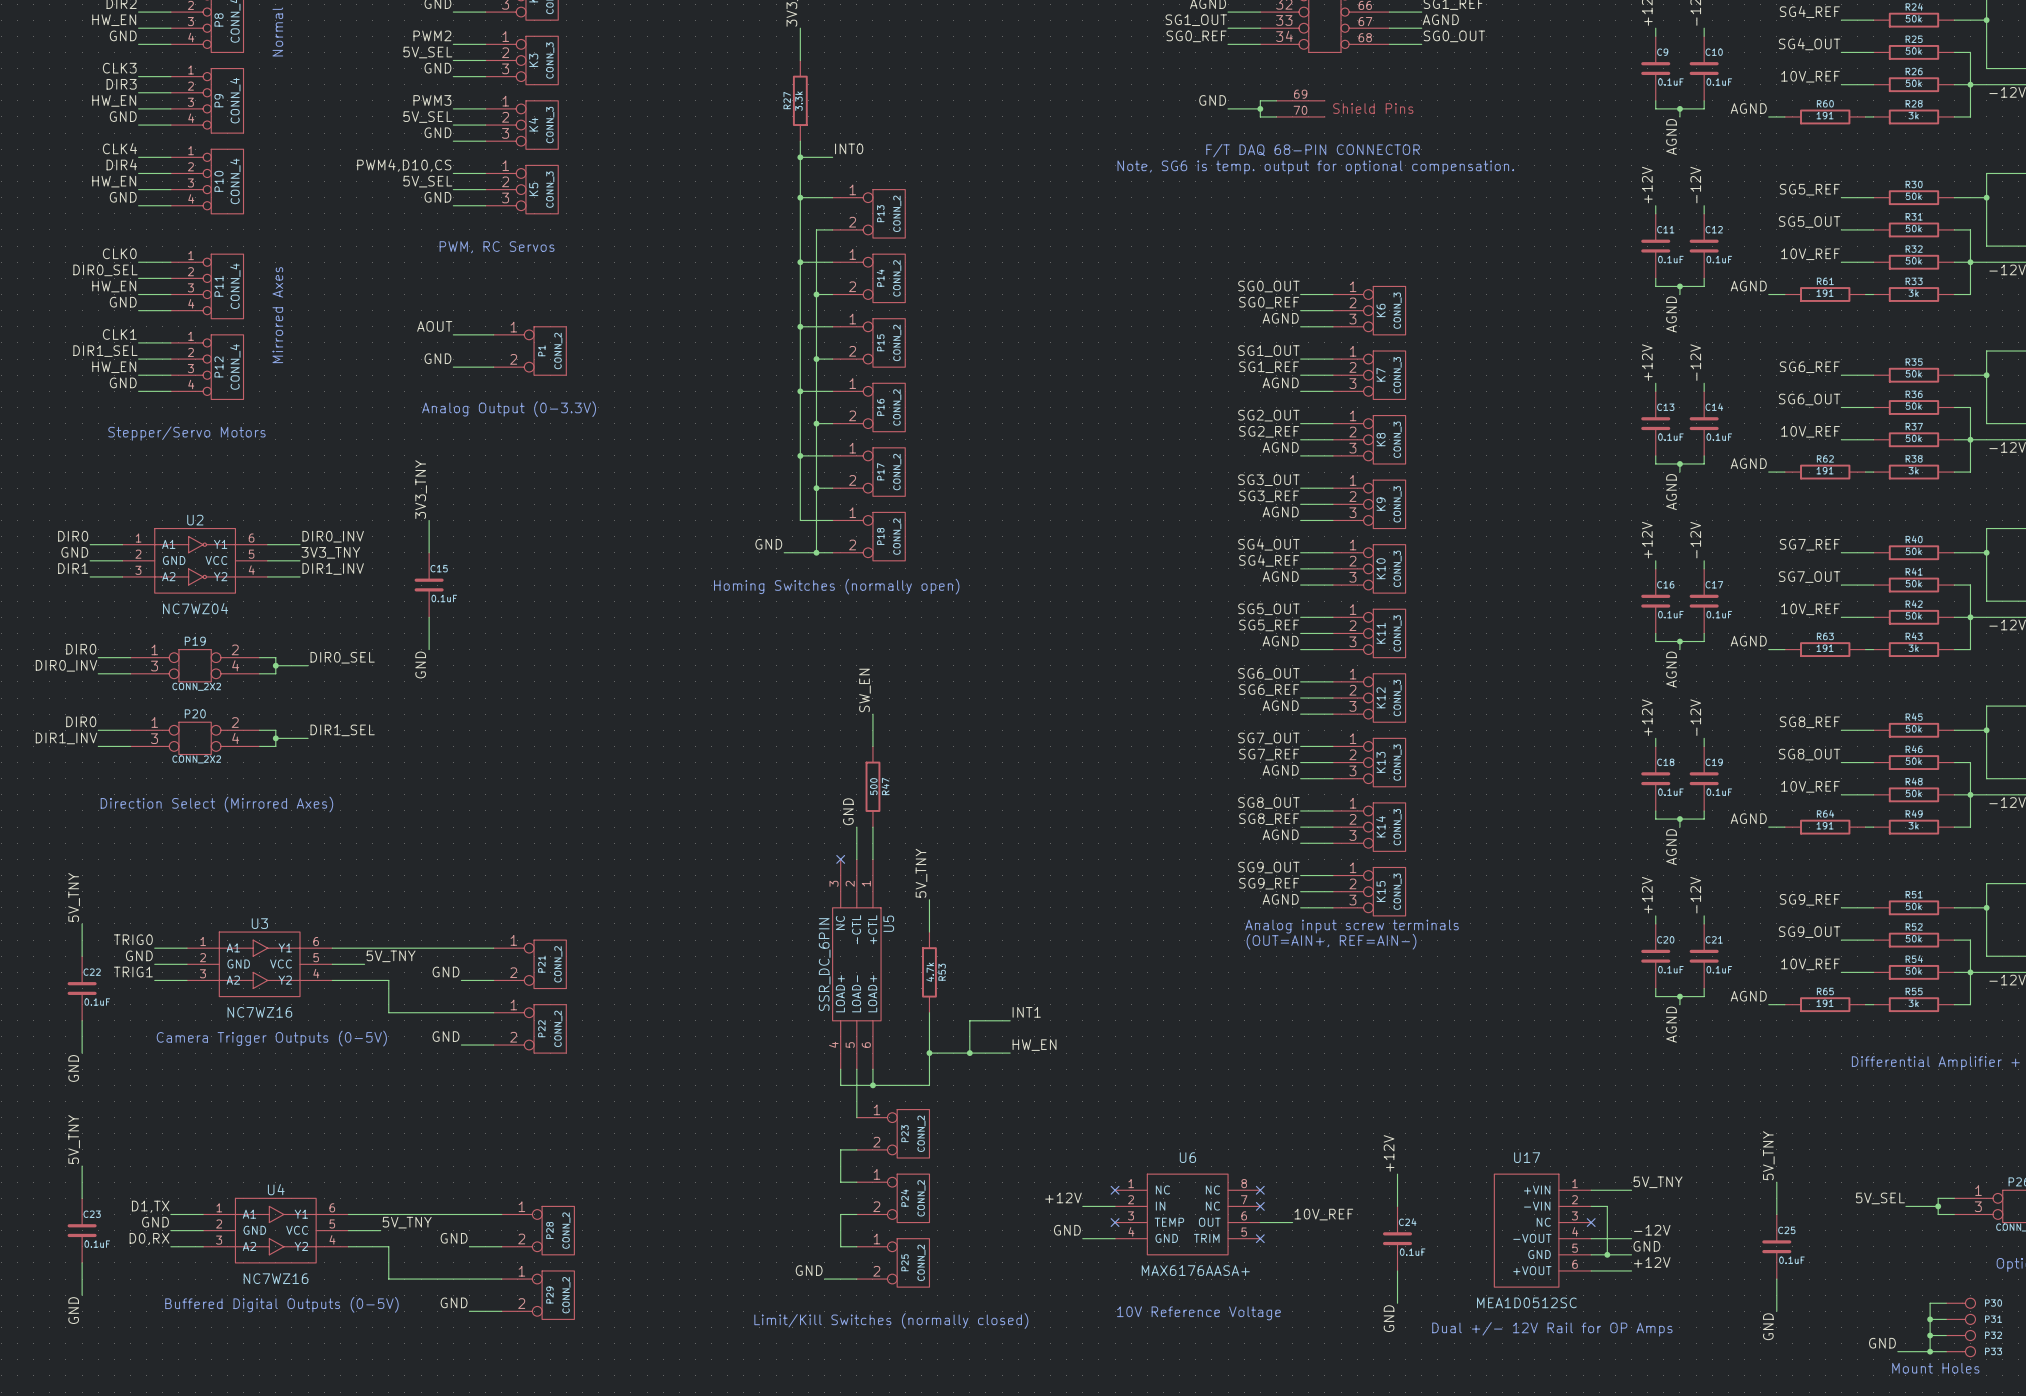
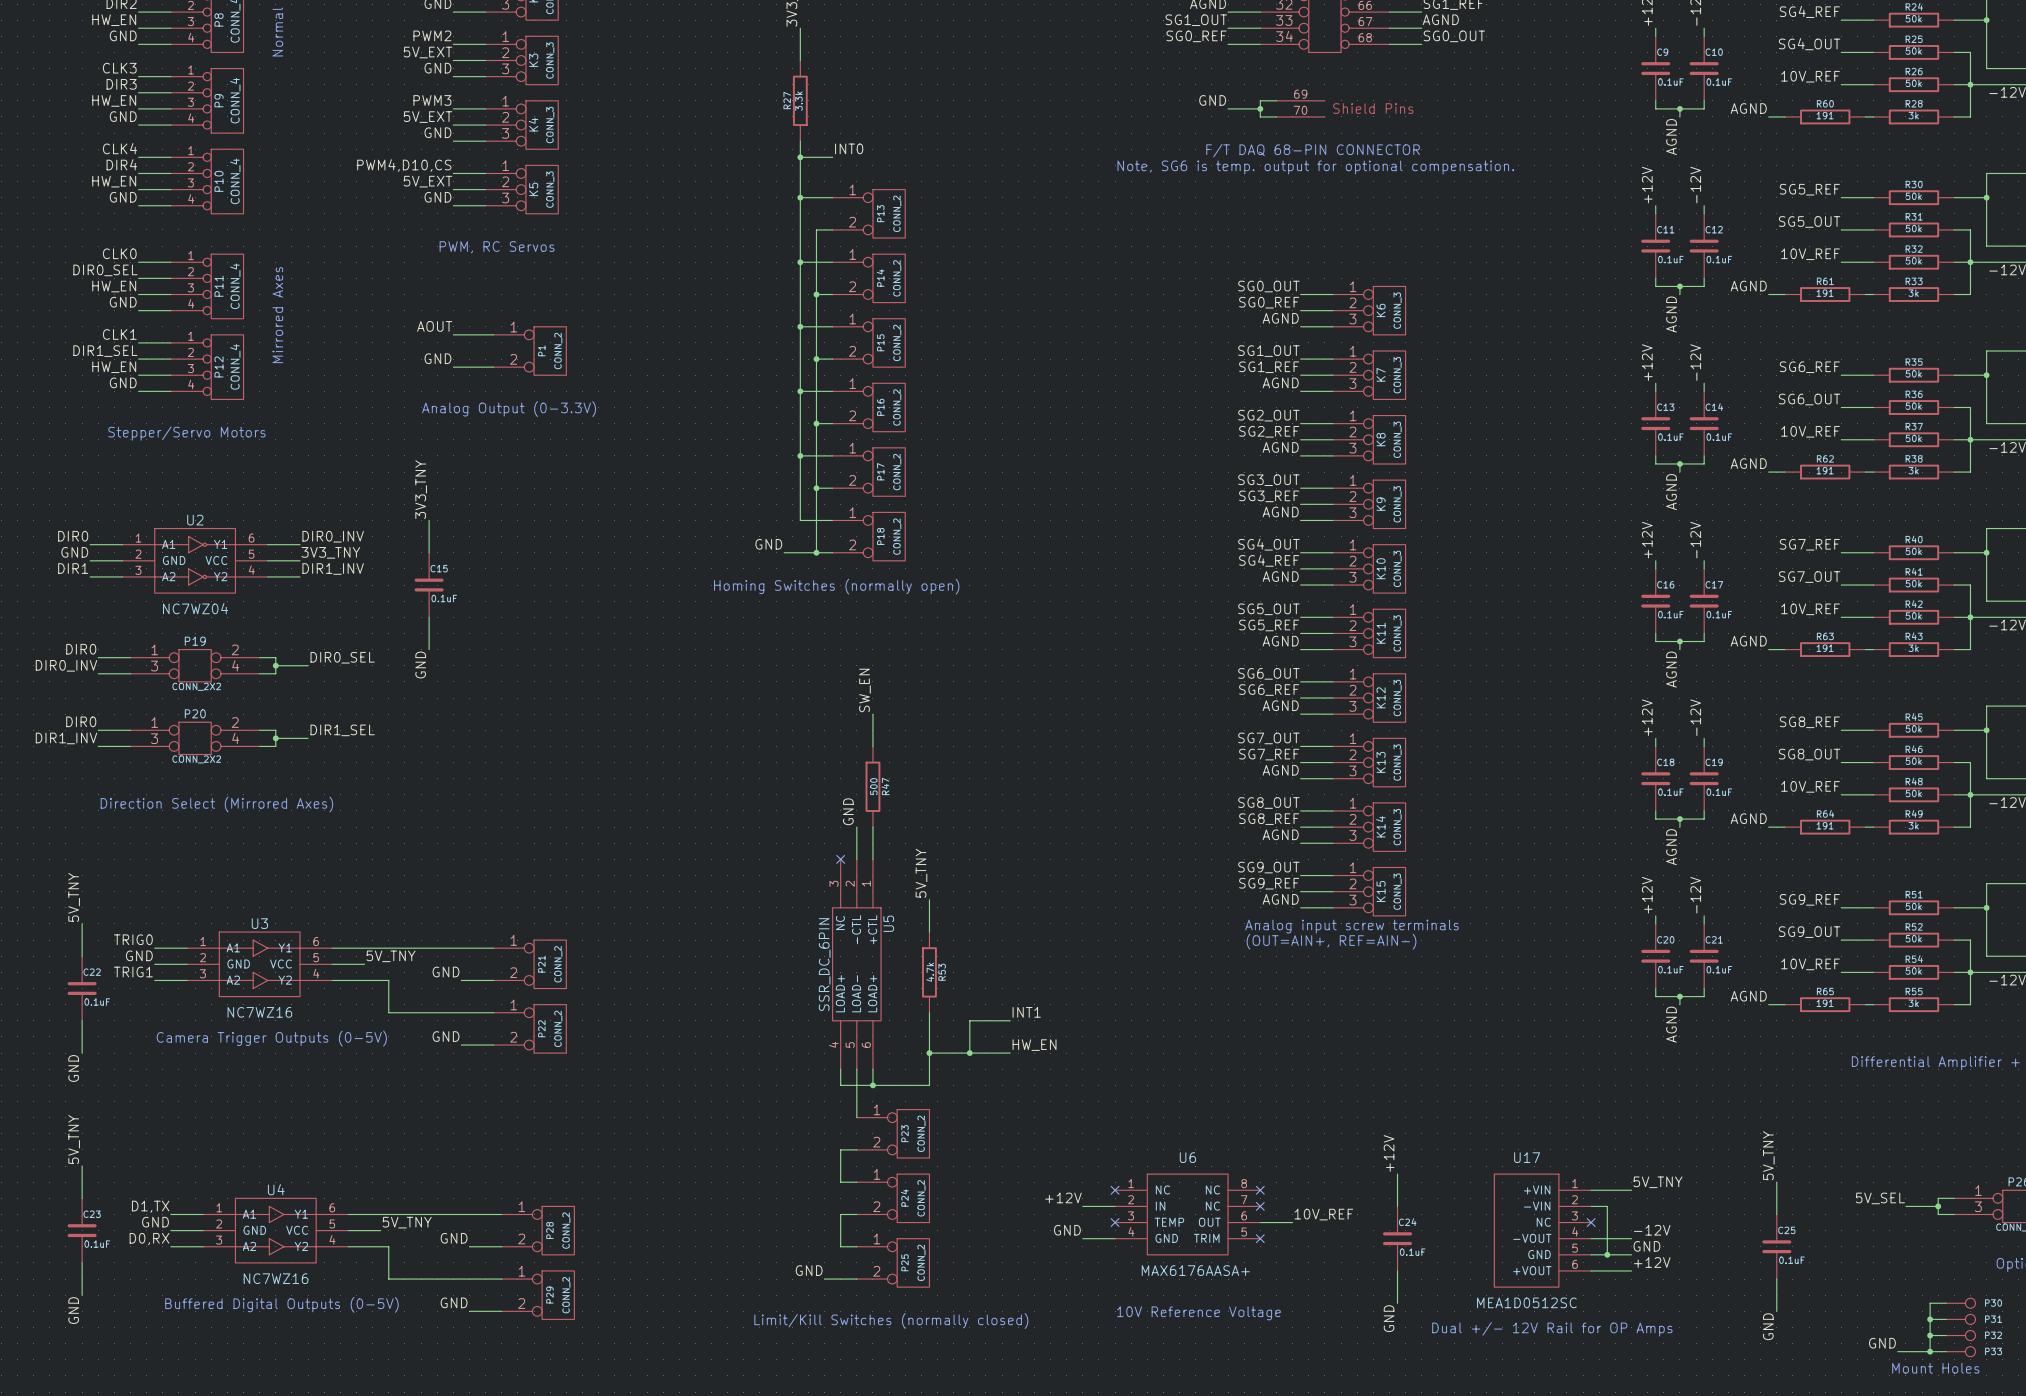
label: 5V_SEL (427, 52) -> 5V_EXT (428, 52)
label: 5V_SEL (427, 117) -> 5V_EXT (428, 117)
label: 5V_SEL (427, 181) -> 5V_EXT (428, 181)

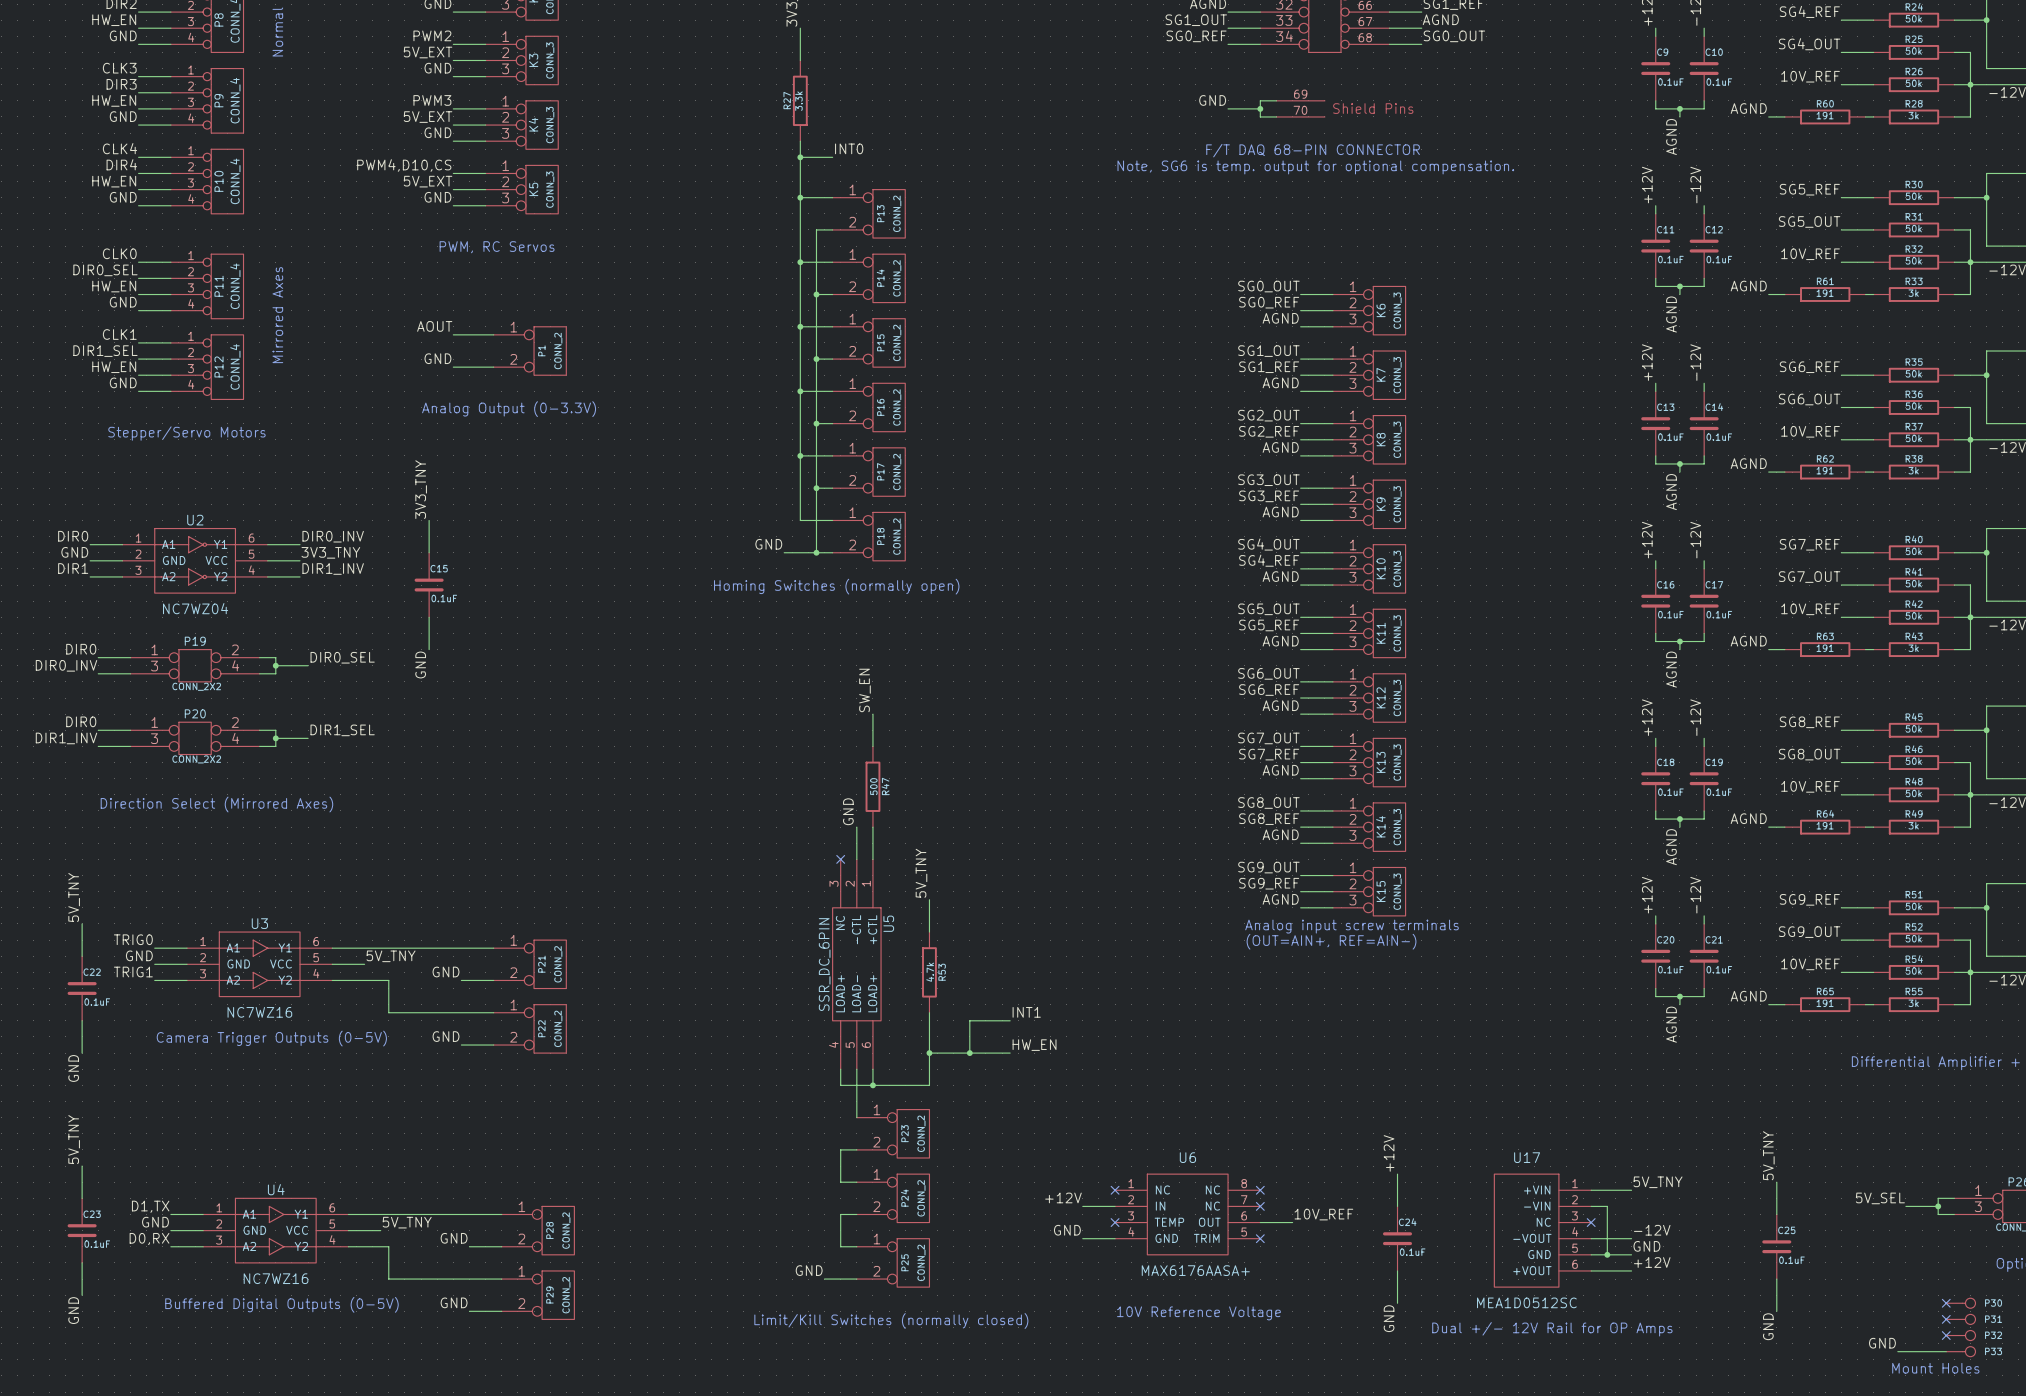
wire: (1946, 1303) (1930, 1303) (1930, 1351) -> none
no-connect mark: none -> (1946, 1303)
wire: (1930, 1319) (1946, 1319) -> none
junction: (1930, 1319) -> none
no-connect mark: none -> (1946, 1319)
wire: (1930, 1335) (1946, 1335) -> none
junction: (1930, 1335) -> none
no-connect mark: none -> (1946, 1335)
junction: (1930, 1351) -> none

